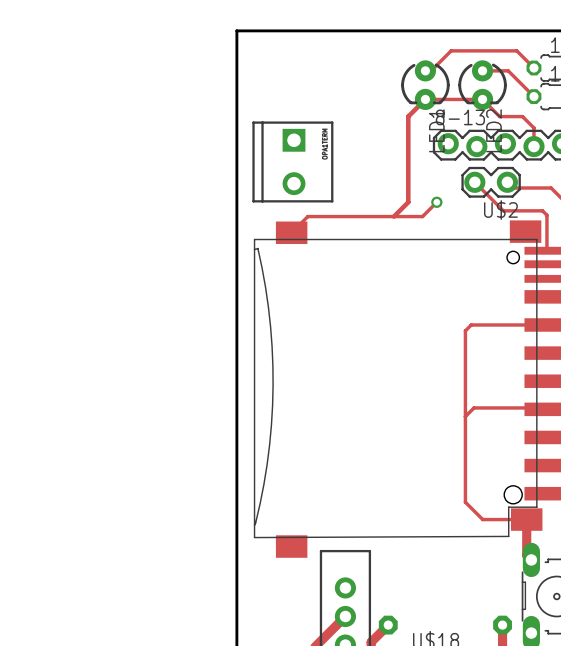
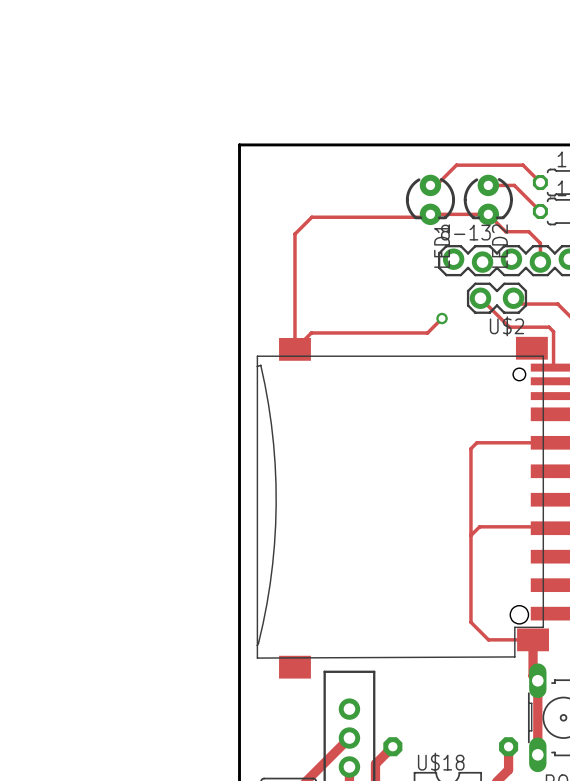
track: (422, 102) (408, 116) (408, 202) (393, 216) -> (427, 217) (311, 217) (294, 234) (294, 349)
part: (292, 161) -> none
track: none -> (537, 680) (537, 754)

